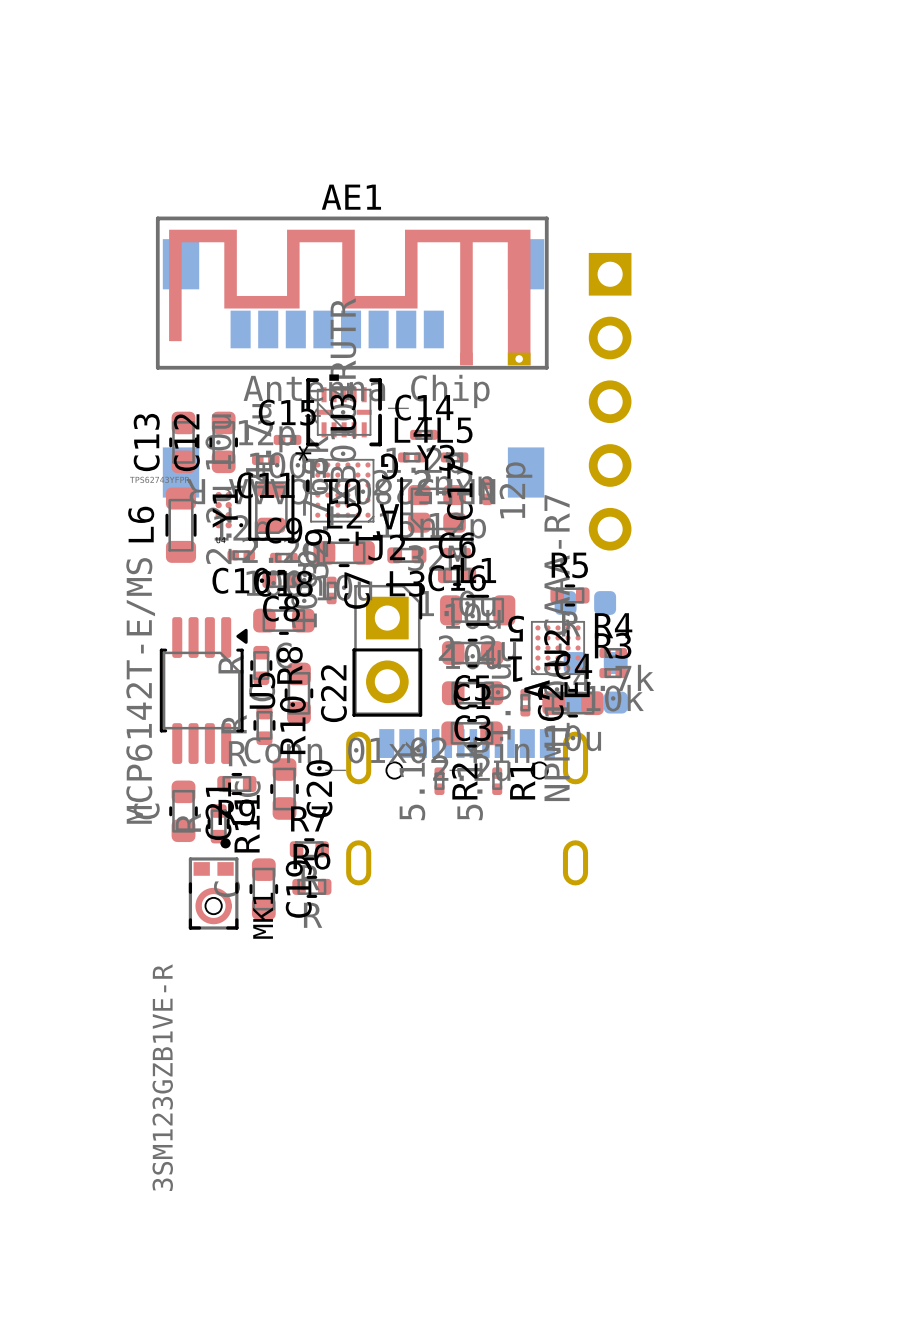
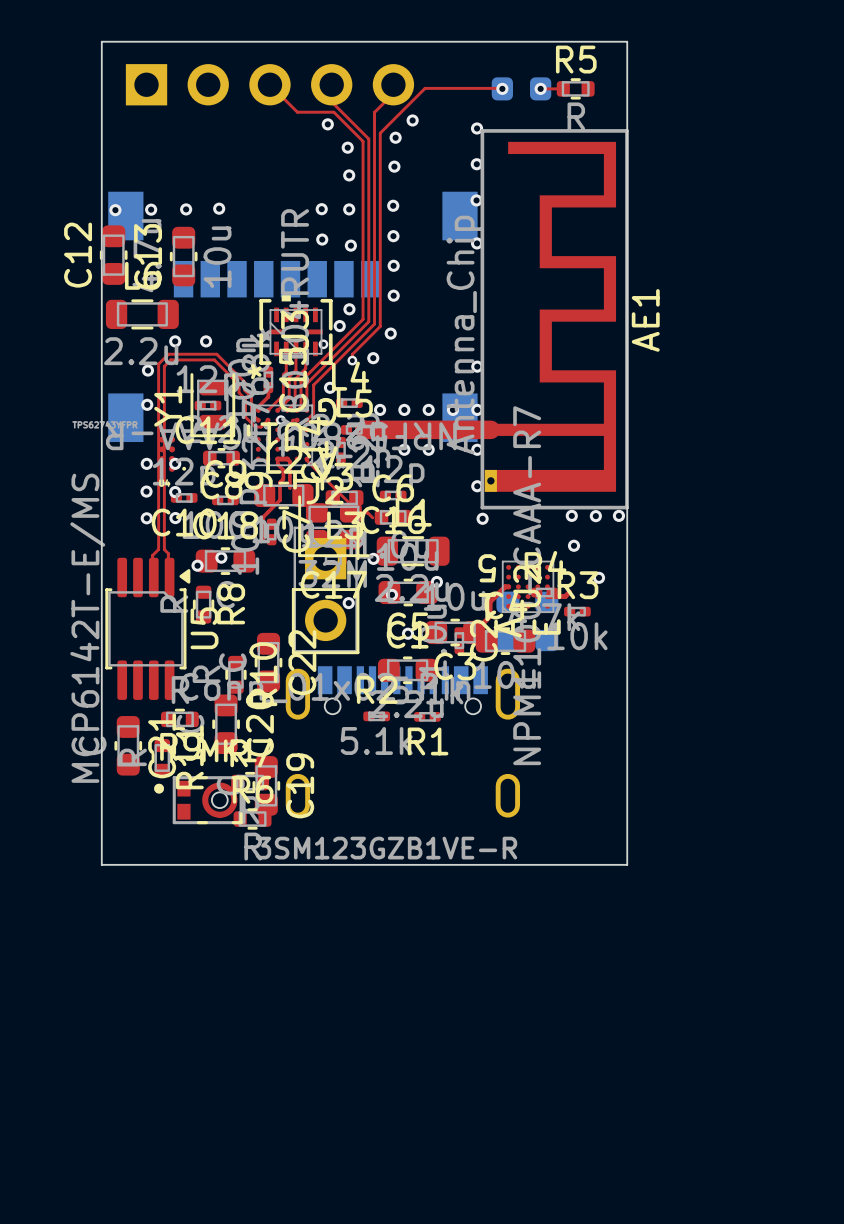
board edge: none -> (101, 41) (627, 41) (627, 864) (101, 864) (101, 41)
top track: none -> (269, 84) (297, 112) (333, 112) (363, 141) (363, 319) (301, 381) (301, 406) (297, 410)
top track: none -> (331, 84) (331, 101) (368, 139) (368, 321) (306, 383) (306, 410)
top track: none -> (393, 84) (393, 93) (374, 112) (374, 324) (313, 385) (313, 413) (306, 420)
top track: none -> (502, 88) (425, 88) (380, 133) (380, 326) (352, 354) (352, 360)
via: none -> (502, 88)
top track: none -> (540, 88) (563, 88)
via: none -> (540, 88)
via: none -> (412, 120)
via: none -> (327, 124)
via: none -> (477, 128)
via: none -> (395, 137)
via: none -> (347, 147)
via: none -> (476, 164)
via: none -> (394, 166)
via: none -> (349, 175)
via: none -> (476, 200)
via: none -> (393, 205)
via: none -> (219, 208)
via: none -> (151, 209)
via: none -> (186, 209)
via: none -> (321, 209)
via: none -> (349, 209)
via: none -> (115, 210)
via: none -> (393, 236)
via: none -> (322, 239)
via: none -> (477, 243)
AE1 rotation: 0° (352, 293) -> 90° clockwise (554, 319)
AE1 position: (352, 293) -> (554, 319)
via: none -> (350, 245)
via: none -> (393, 265)
via: none -> (393, 295)
via: none -> (349, 309)
via: none -> (339, 326)
via: none -> (390, 333)
via: none -> (175, 341)
via: none -> (206, 341)
via: none -> (323, 344)
top track: none -> (286, 348) (283, 395) (268, 410)
top track: none -> (295, 348) (295, 370) (289, 376) (289, 398) (277, 410)
top track: none -> (305, 348) (305, 368) (295, 379) (295, 402) (287, 410)
part rotation: 0° (610, 401) -> 90° counterclockwise (269, 84)
part position: (610, 401) -> (269, 84)
U3 position: (344, 410) -> (295, 330)
via: none -> (373, 358)
via: none -> (352, 360)
via: none -> (477, 366)
via: none -> (147, 370)
C14 rotation: 0° (423, 434) -> 90° clockwise (341, 450)
C14 position: (423, 434) -> (341, 450)
C15 rotation: 0° (287, 439) -> 90° clockwise (268, 379)
C15 position: (287, 439) -> (268, 379)
top track: none -> (268, 387) (268, 396) (258, 406) (258, 410)
via: none -> (330, 387)
C13 position: (183, 442) -> (183, 256)
C12 position: (223, 442) -> (113, 255)
L5 position: (454, 457) -> (354, 429)
via: none -> (147, 404)
via: none -> (380, 409)
via: none -> (404, 409)
via: none -> (428, 409)
via: none -> (452, 409)
via: none -> (477, 409)
via: none -> (280, 420)
top track: none -> (258, 420) (251, 413) (251, 397) (244, 390) (244, 382) (216, 354) (168, 354) (158, 364) (158, 549) (152, 555) (152, 568)
top track: none -> (268, 420) (261, 427) (255, 427) (245, 417) (245, 399) (239, 392) (239, 384) (214, 359) (170, 359) (164, 366) (164, 549) (168, 553) (168, 568)
top track: none -> (297, 420) (292, 421)
top track: none -> (364, 429) (490, 429)
C17 rotation: 0° (487, 491) -> 90° clockwise (333, 560)
C17 position: (487, 491) -> (333, 560)
via: none -> (404, 449)
via: none -> (428, 449)
via: none -> (477, 449)
Y1 position: (271, 507) -> (212, 405)
Y3 position: (436, 508) -> (333, 526)
top track: none -> (306, 459) (350, 504) (350, 512) (367, 512) (372, 517)
via: none -> (146, 463)
via: none -> (175, 463)
L6 rotation: 0° (181, 525) -> 90° clockwise (142, 314)
L6 position: (181, 525) -> (142, 314)
via: none -> (477, 486)
top track: none -> (289, 488) (289, 461) (287, 459) (277, 459) (277, 464) (283, 470) (283, 479) (280, 482) (280, 500) (263, 516) (263, 540)
via: none -> (146, 491)
via: none -> (175, 492)
via: none -> (571, 515)
via: none -> (618, 515)
via: none -> (595, 516)
via: none -> (146, 518)
via: none -> (175, 518)
via: none -> (482, 518)
C8 position: (281, 580) -> (221, 458)
R5 position: (569, 595) -> (575, 88)
part position: (585, 603) -> (521, 88)
via: none -> (574, 545)
via: none -> (221, 557)
via: none -> (373, 558)
via: none -> (197, 565)
via: none -> (599, 577)
via: none -> (436, 581)
U2 position: (558, 647) -> (528, 586)
top track: none -> (508, 586) (505, 586) (490, 601) (490, 616) (473, 632)
top track: none -> (569, 592) (565, 596) (547, 596)
via: none -> (391, 594)
via: none -> (348, 603)
R3 position: (613, 673) -> (577, 611)
C22 position: (298, 693) -> (268, 662)
C3 position: (472, 693) -> (455, 632)
via: none -> (408, 633)
R10 position: (264, 725) -> (235, 674)
R2 rotation: 0° (439, 781) -> 90° clockwise (376, 716)
R1 rotation: 0° (497, 781) -> 90° clockwise (427, 716)
MK1 rotation: 0° (213, 883) -> 90° counterclockwise (198, 800)
C19 position: (263, 889) -> (266, 785)

